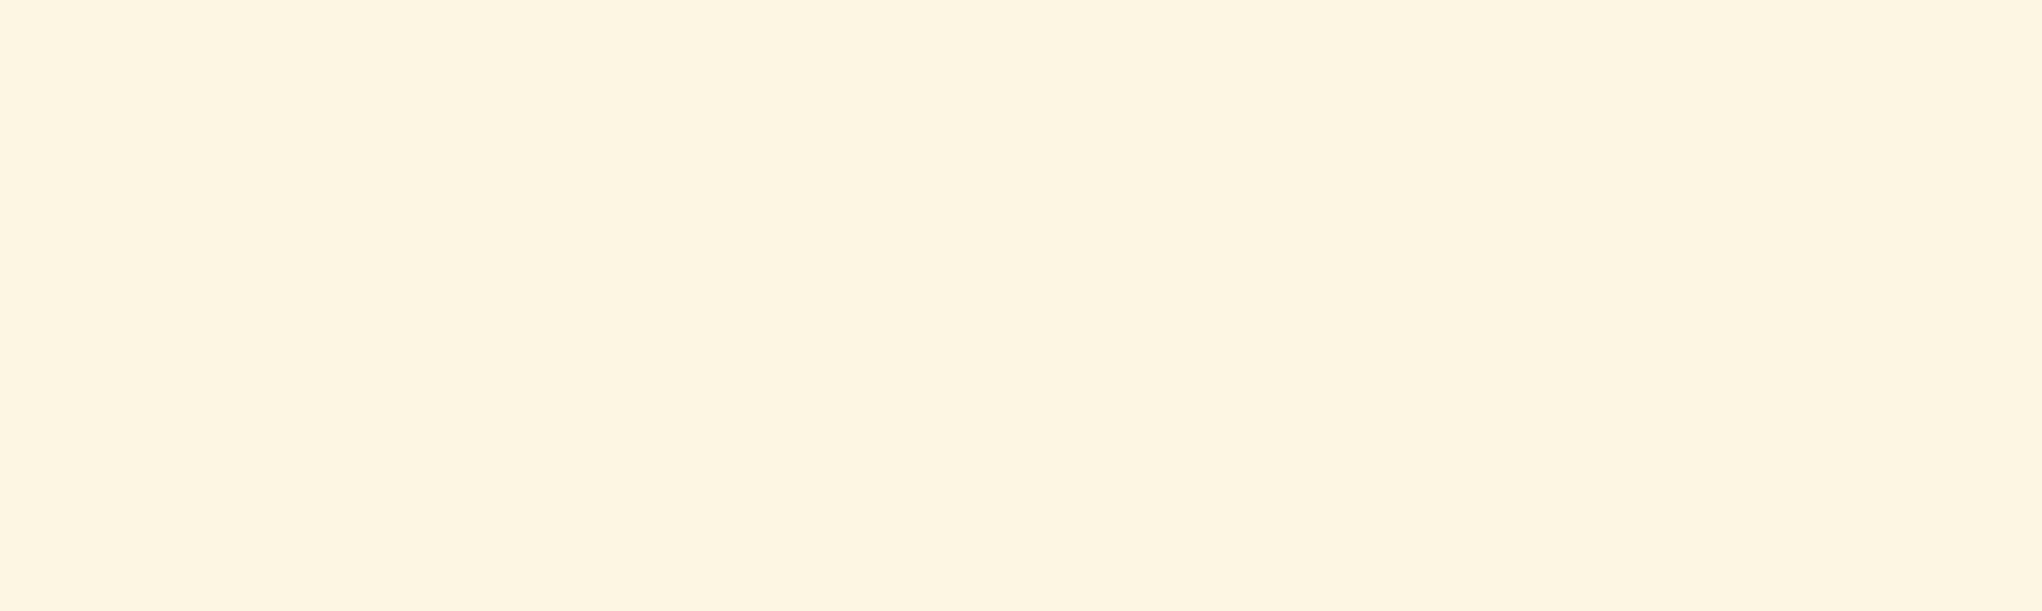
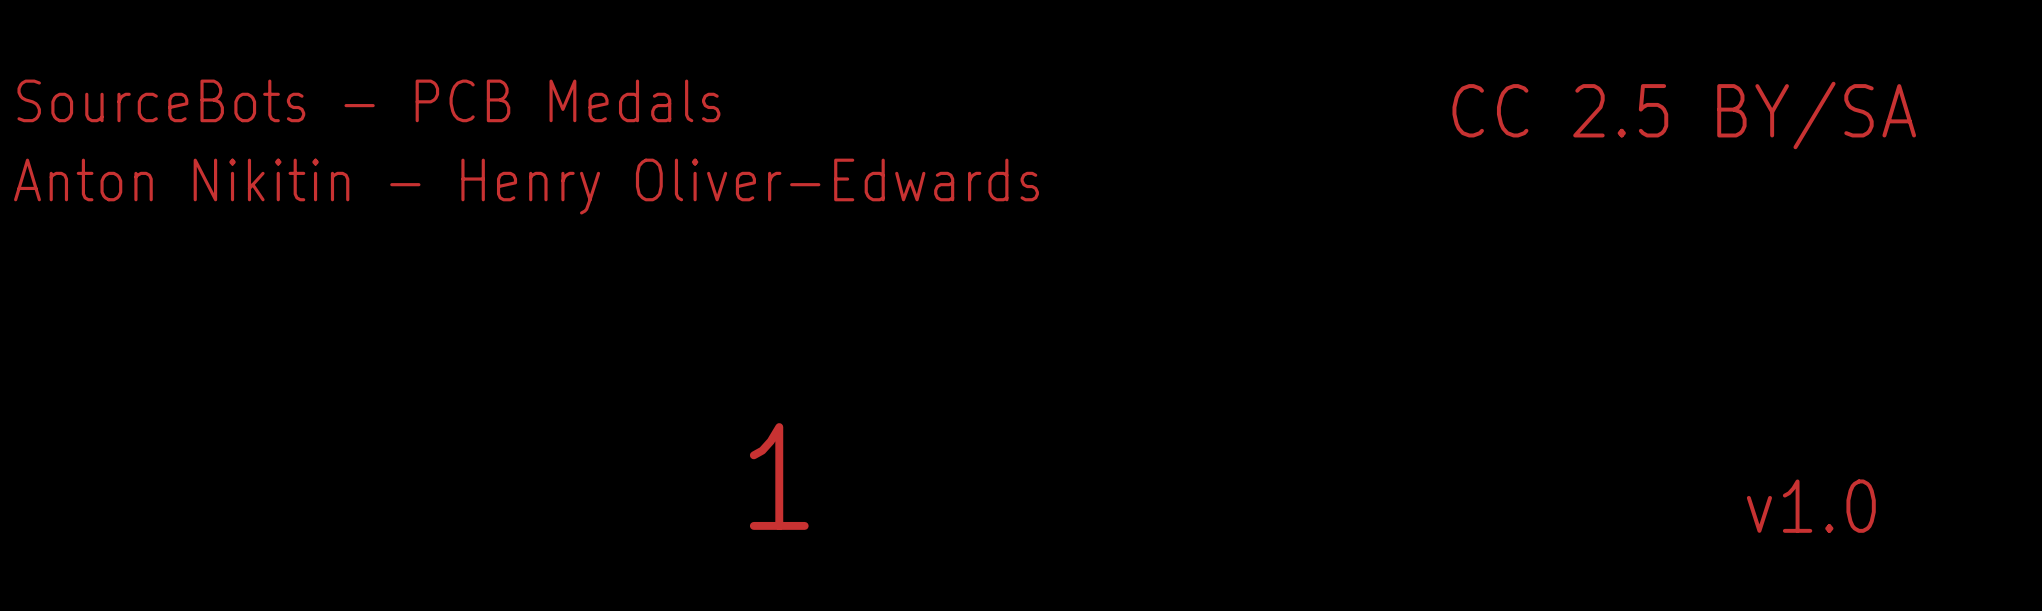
text: none -> SourceBots - PCB Medals (368, 100)
text: none -> CC 2.5 BY/SA (1684, 115)
text: none -> Anton Nikitin - Henry Oliver-Edwards (526, 186)
text: none -> 1 (779, 476)
text: none -> v1.0 (1811, 506)

